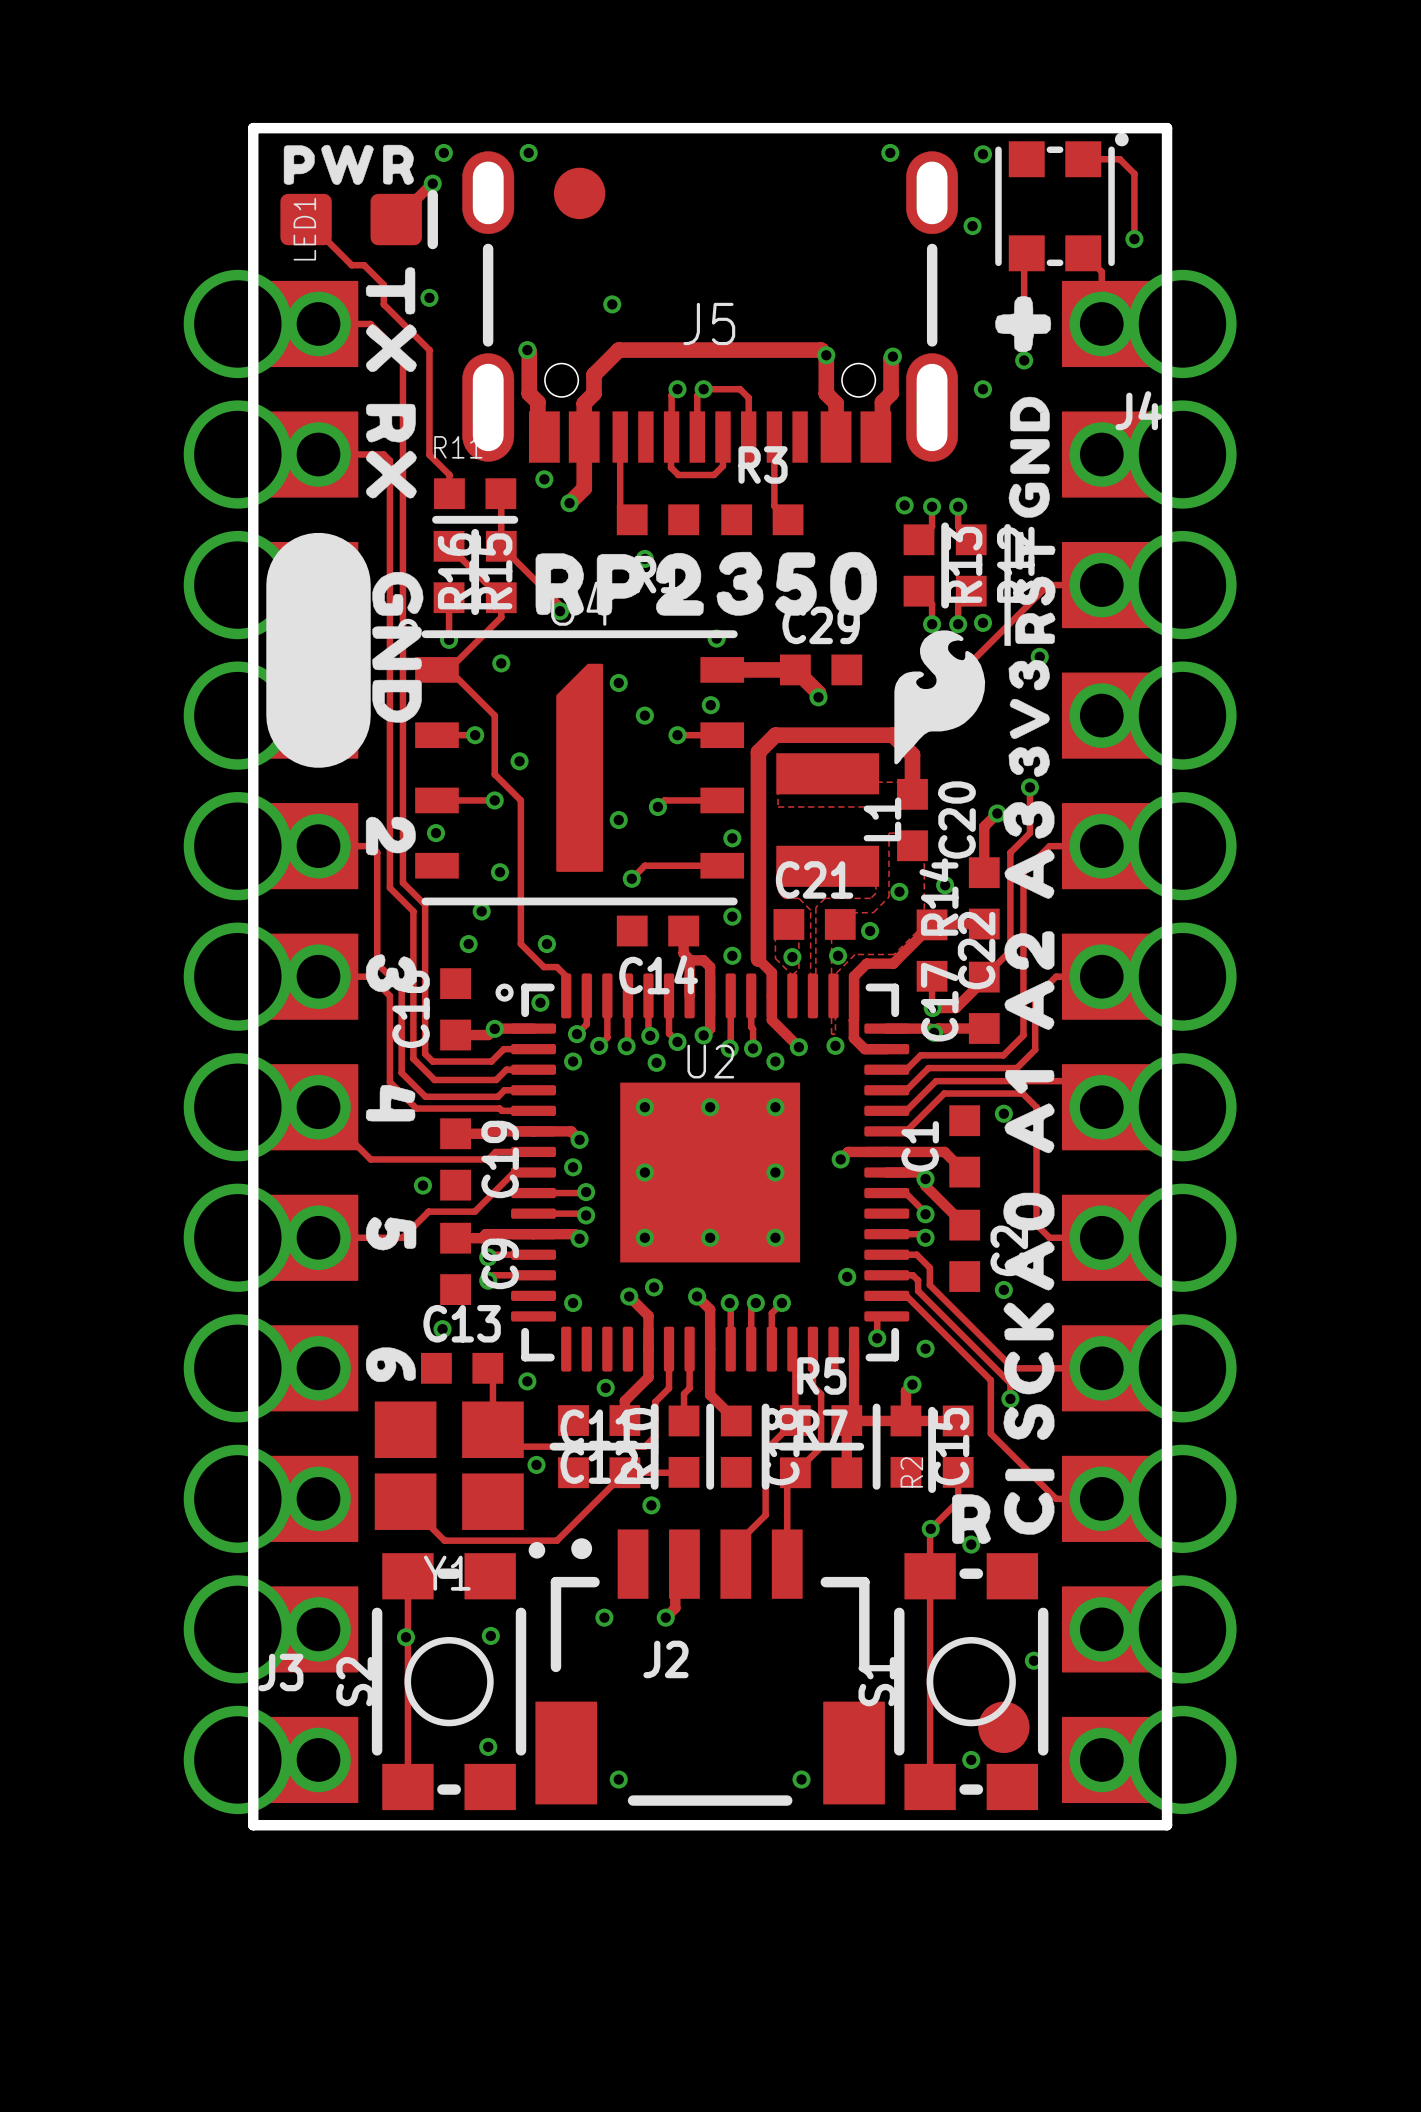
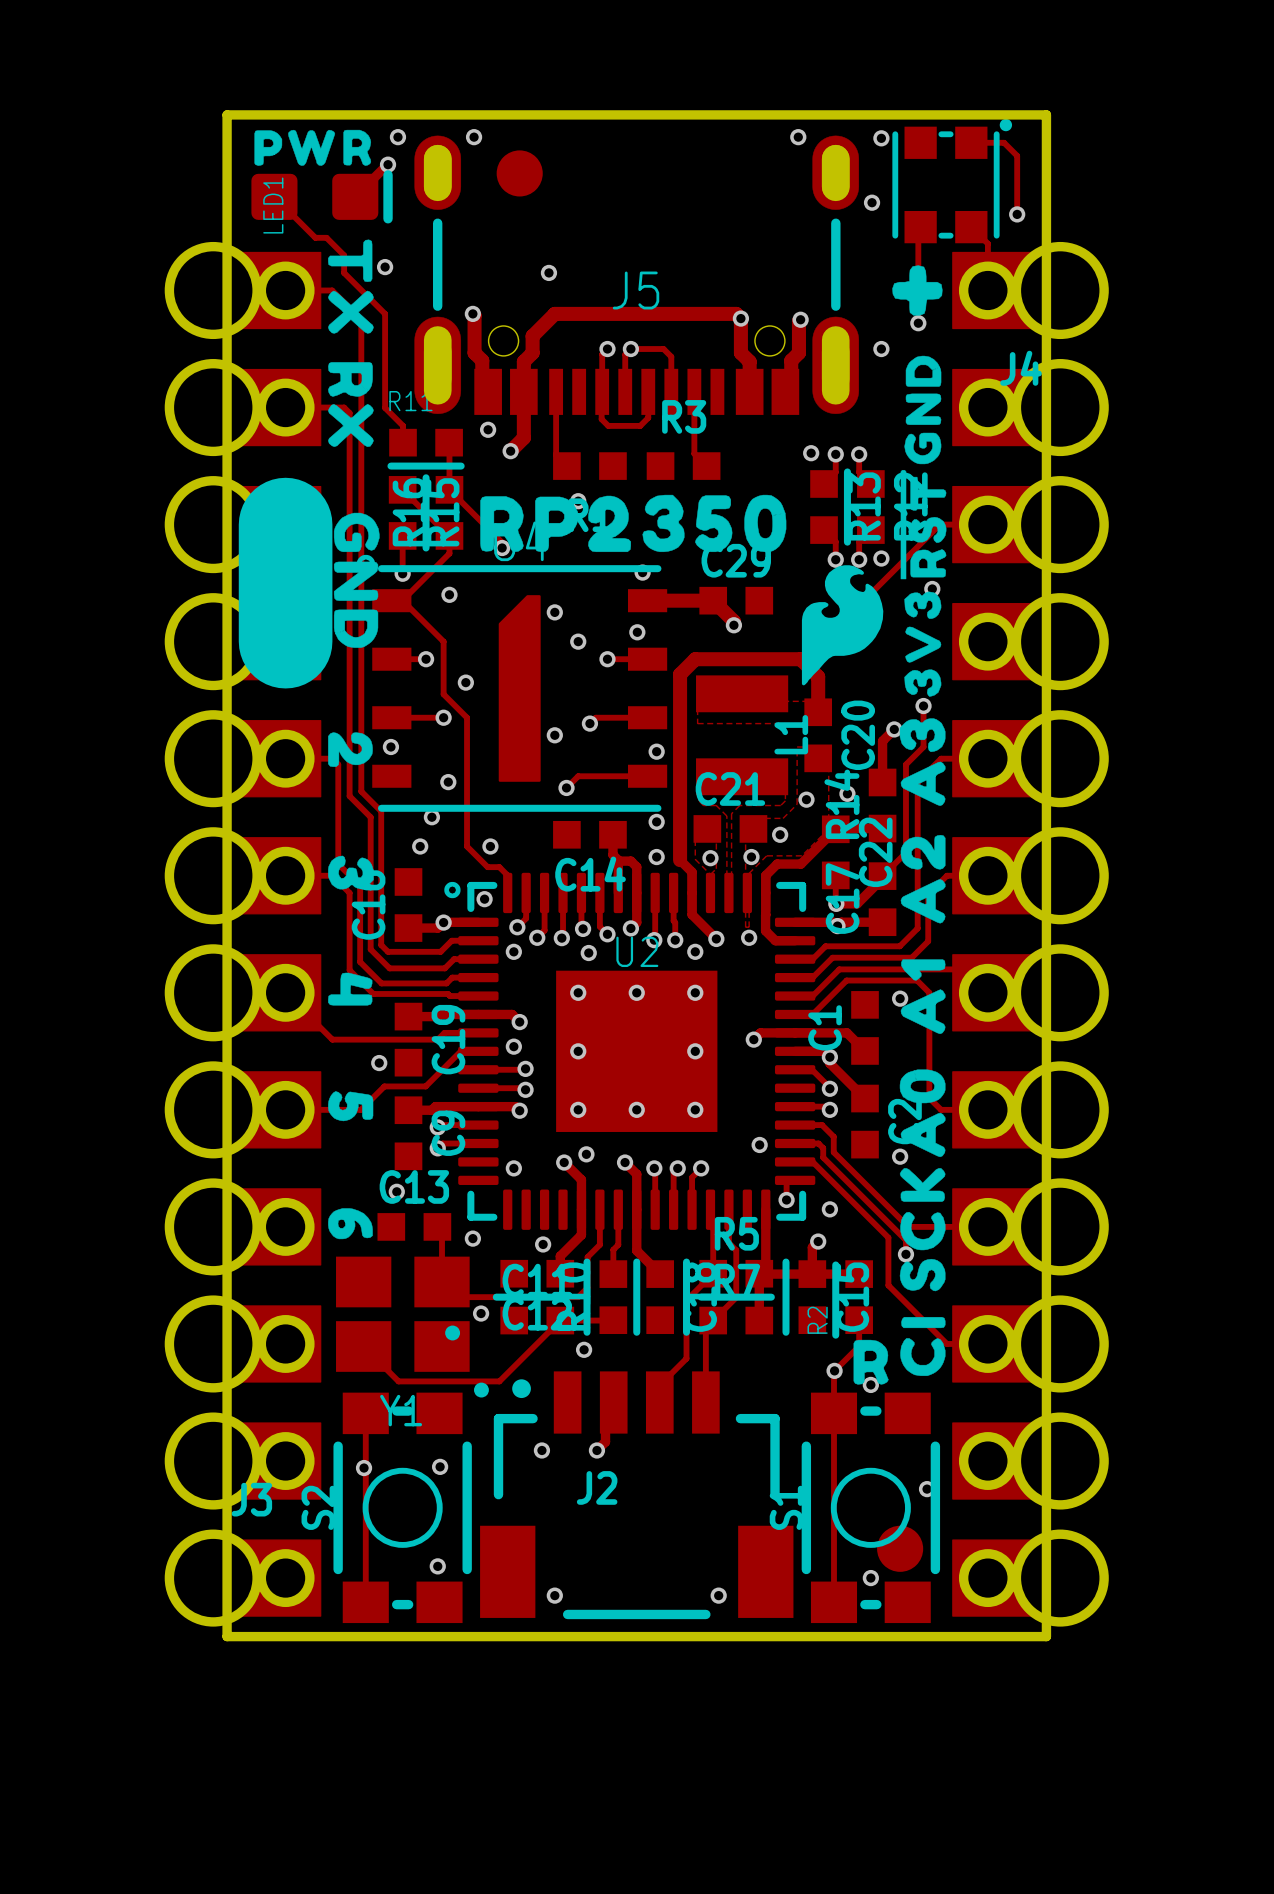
drawing: none -> [445, 1325, 461, 1341]

